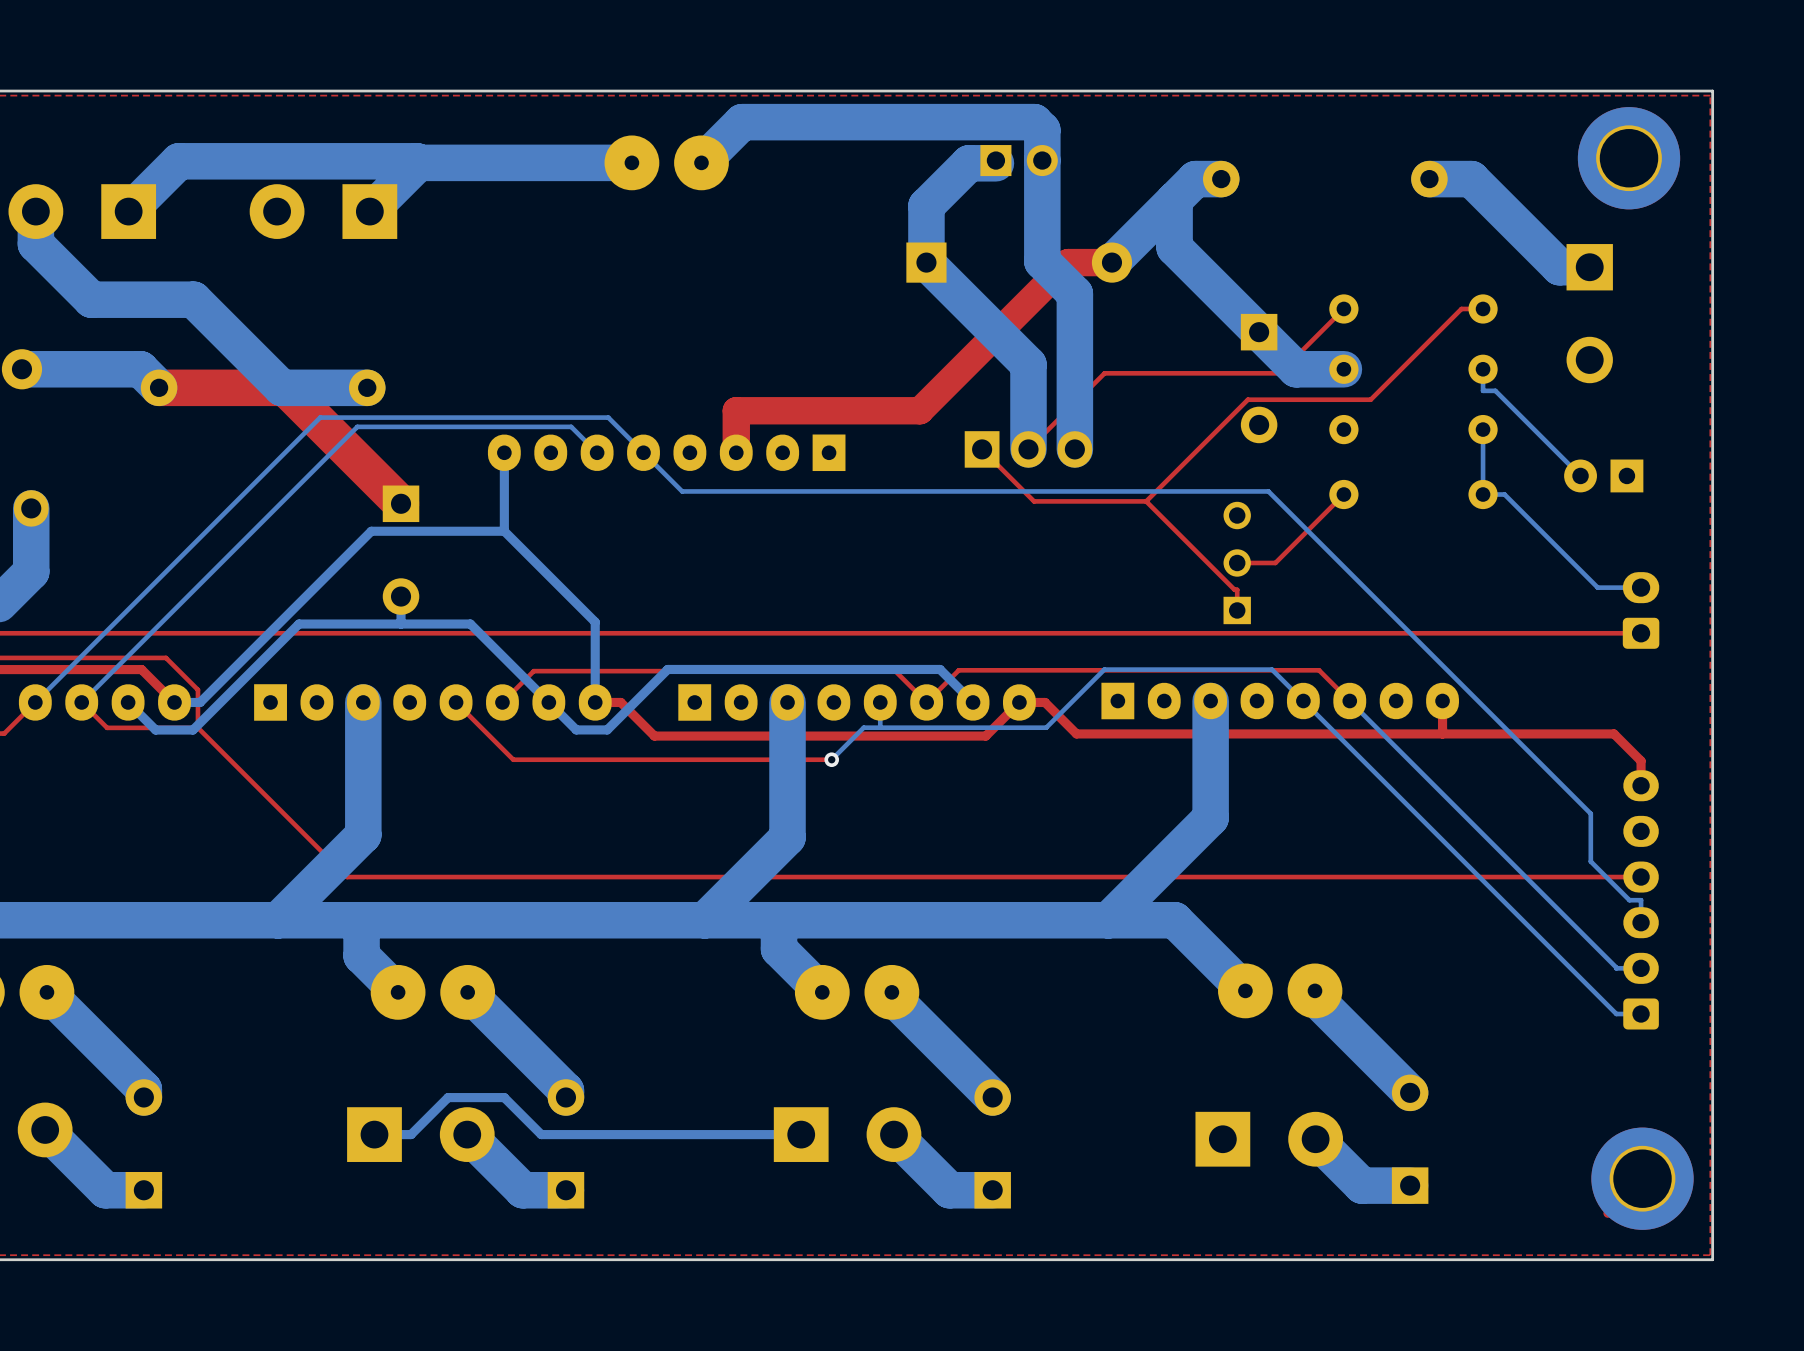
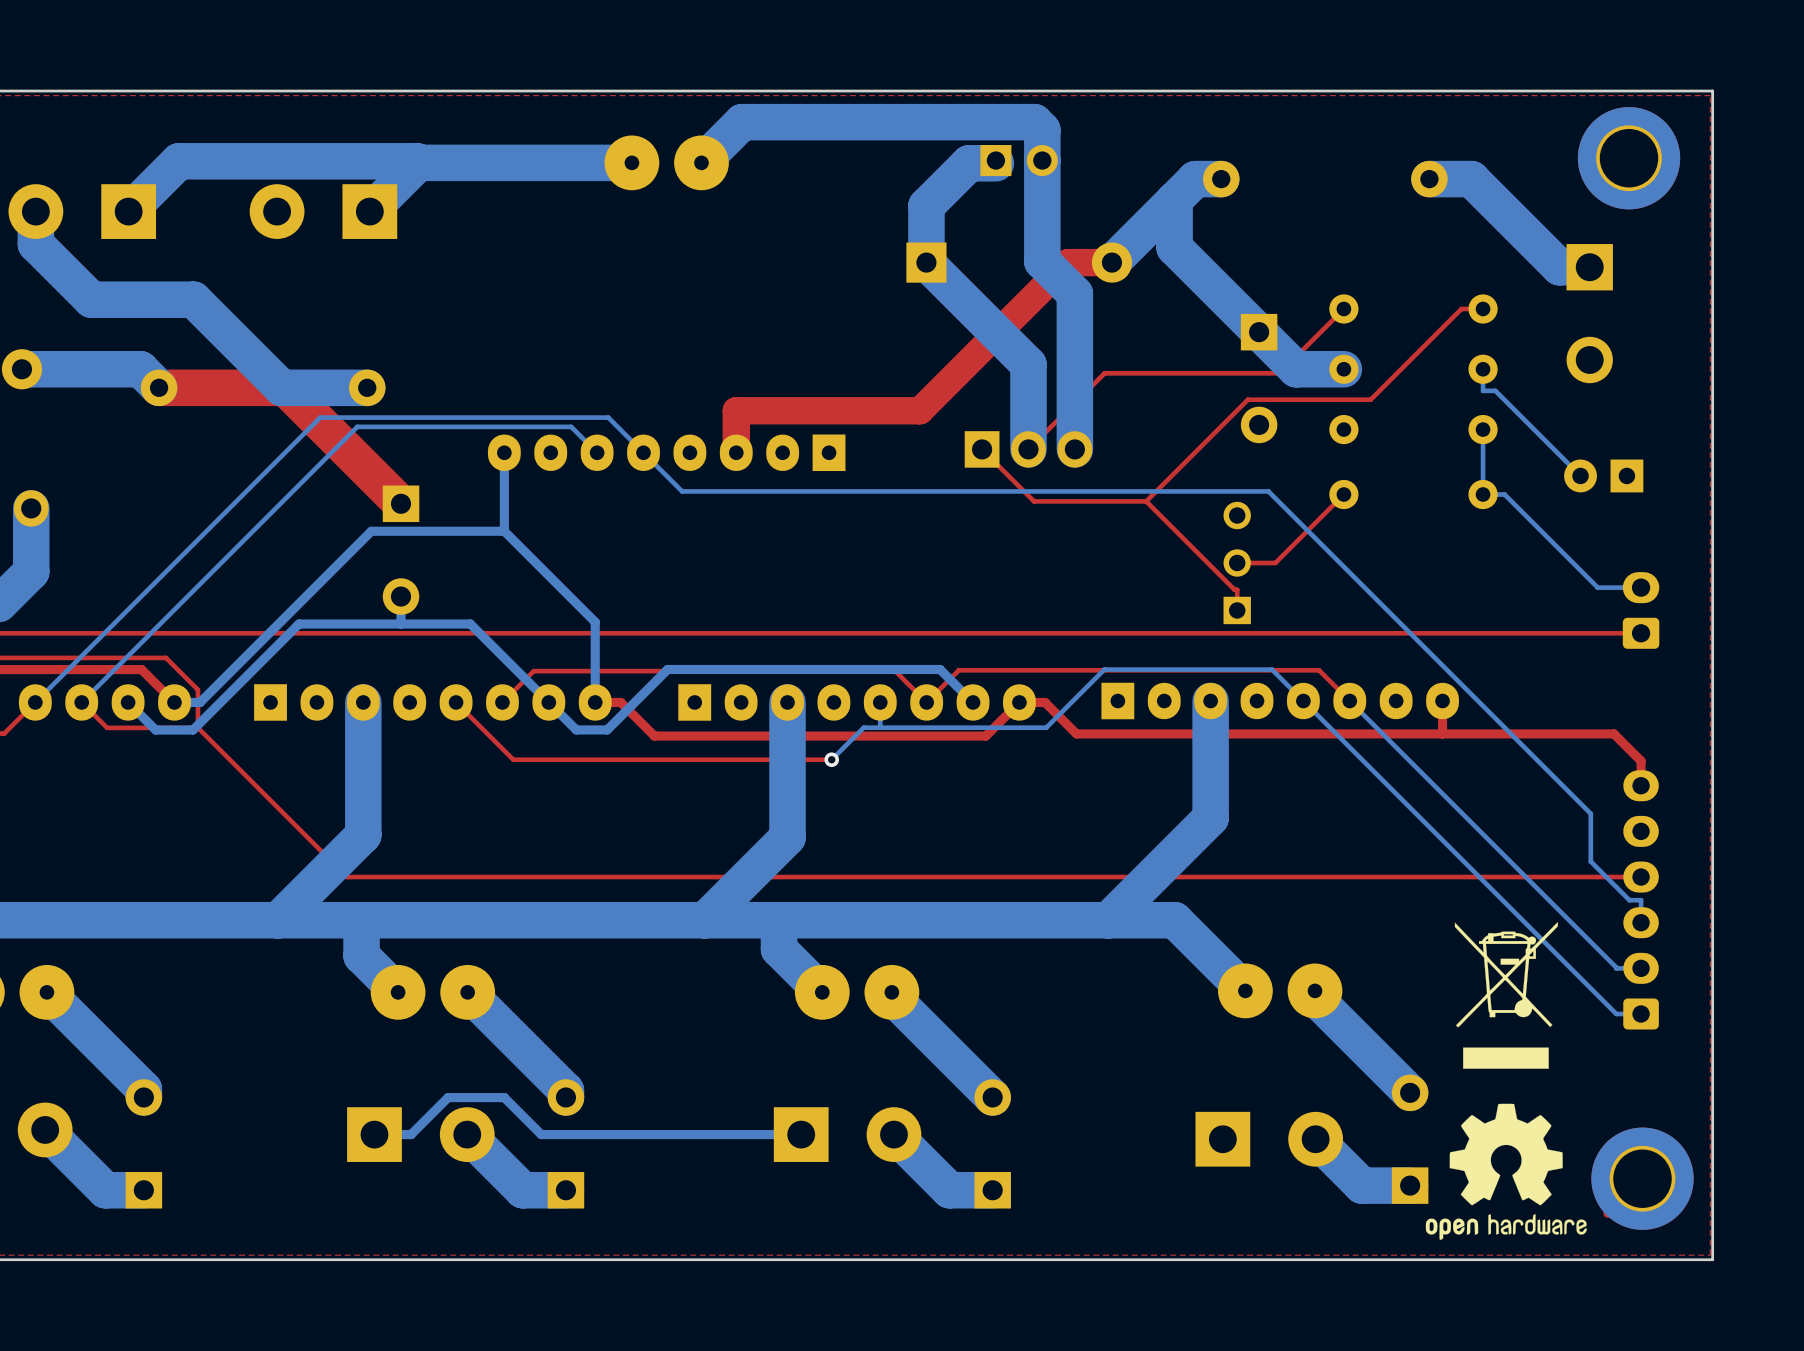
drawing: none -> [1454, 922, 1558, 1069]
drawing: none -> [1425, 1103, 1587, 1240]

